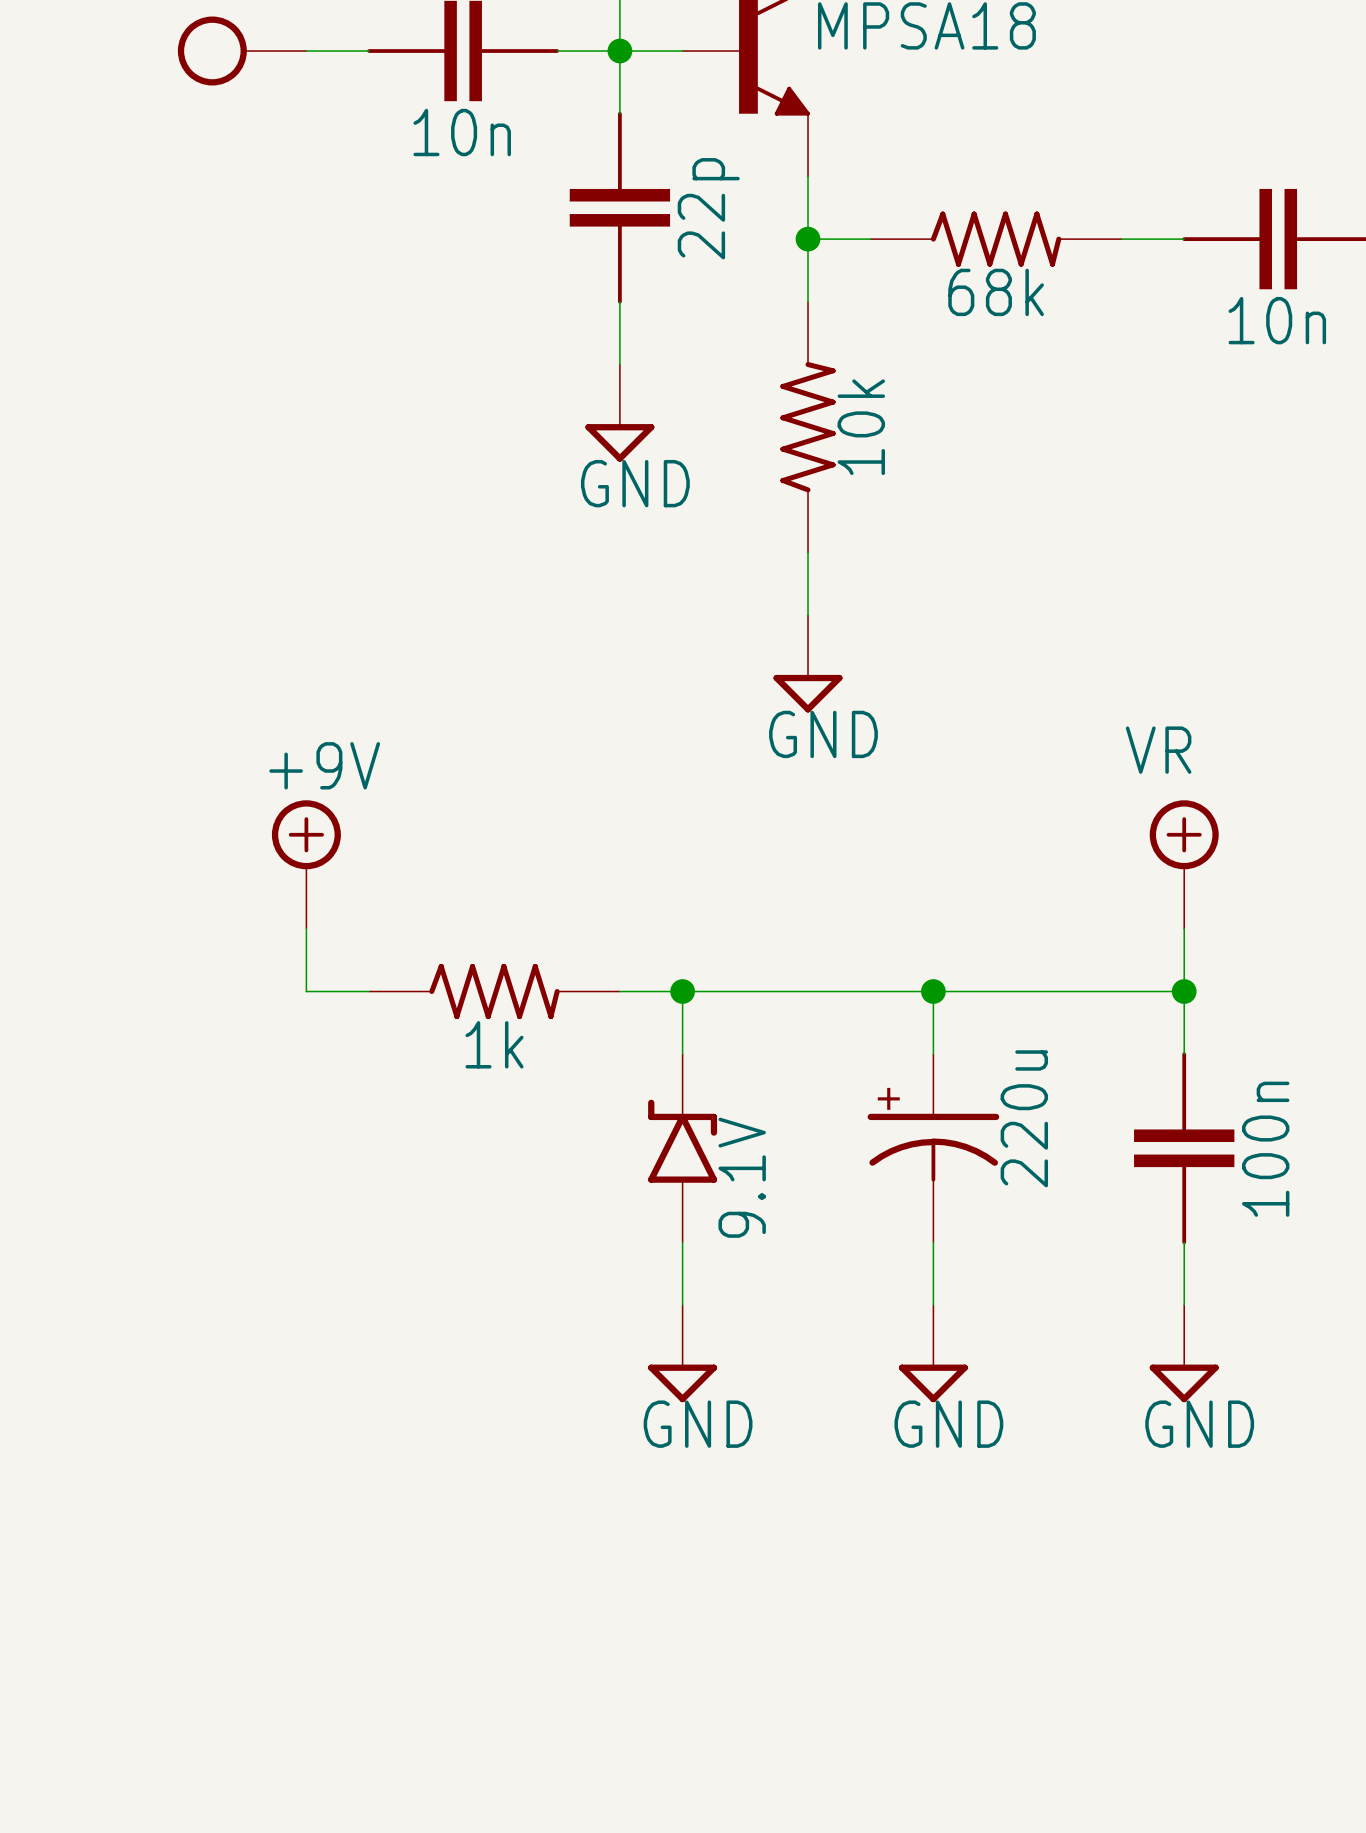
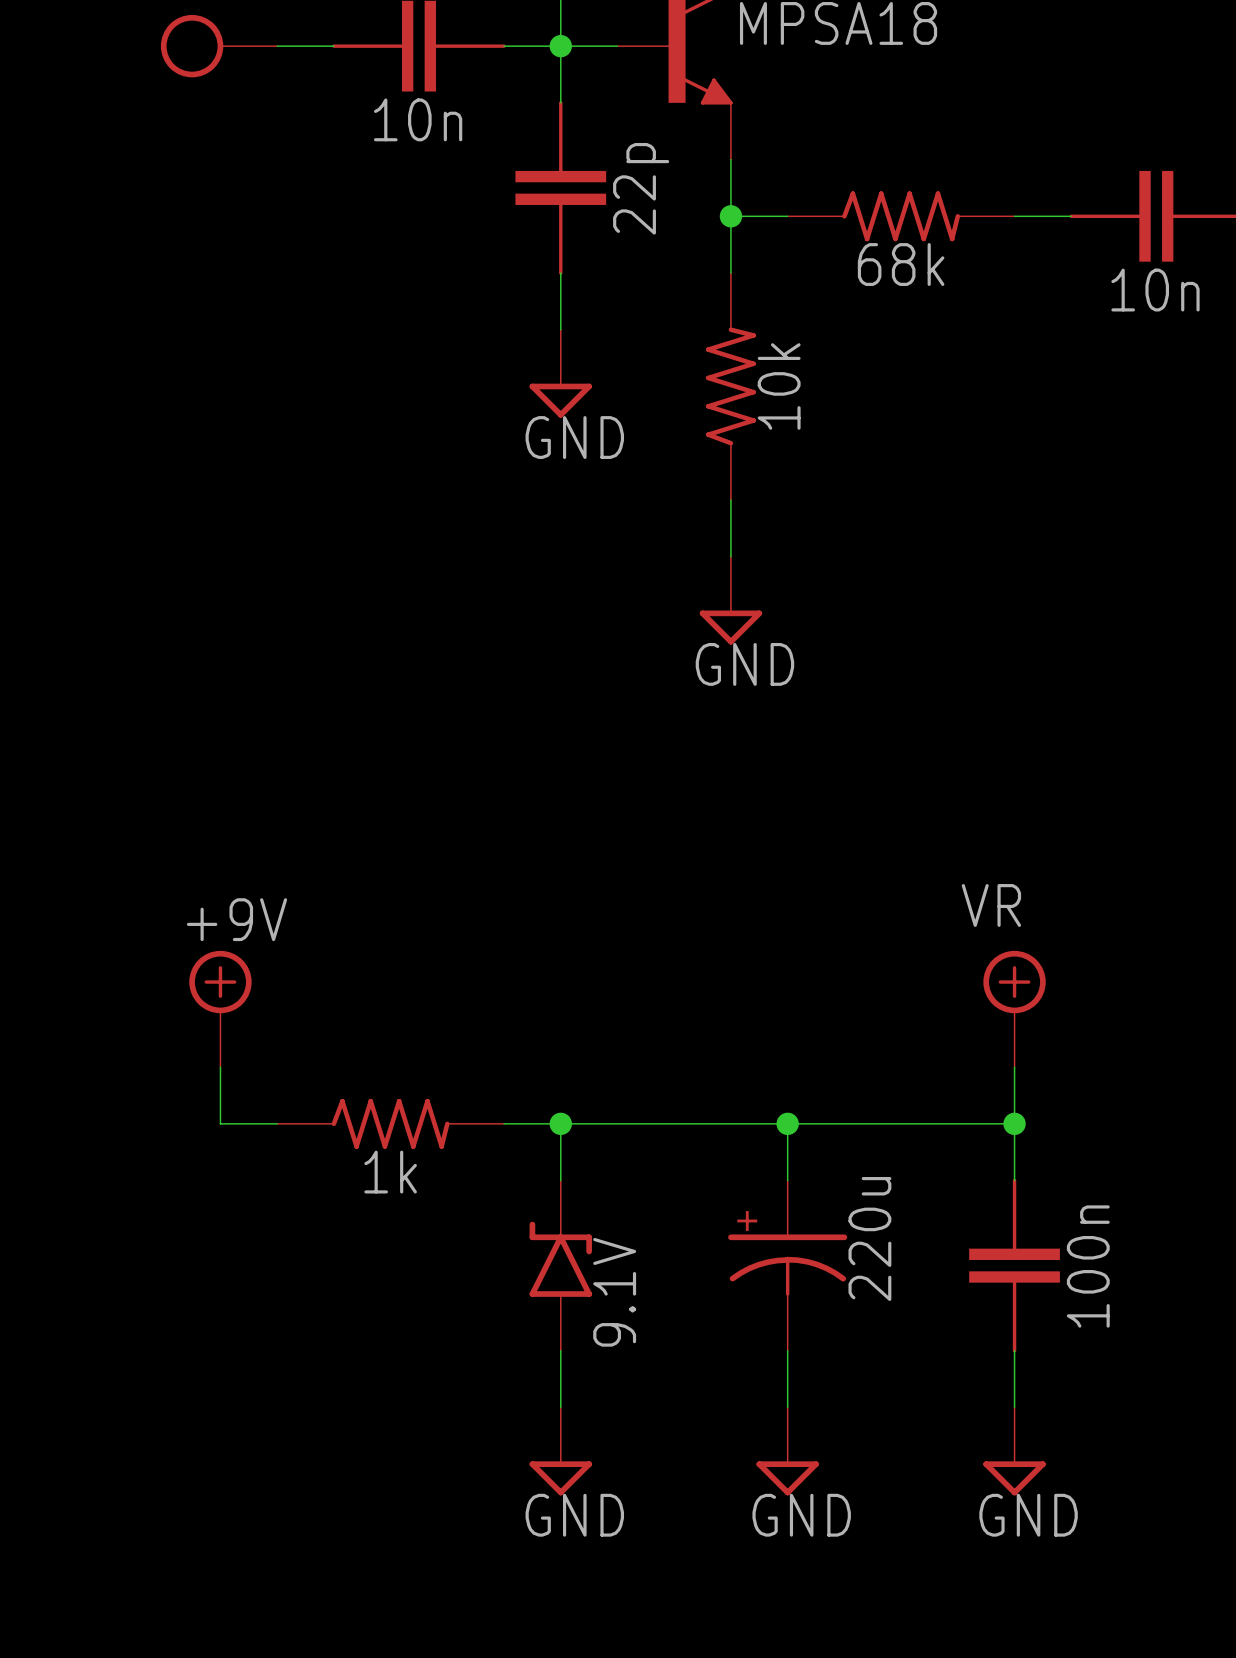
power symbol position: +9V (306, 864) -> +9V (220, 1008)
power symbol position: VR (1184, 864) -> VR (1014, 1008)
wire: (306, 928) (306, 991) (369, 991) -> (220, 1067) (220, 1123) (277, 1123)
wire: (1184, 928) (1184, 1054) -> (1014, 1067) (1014, 1180)
part position: (494, 991) -> (390, 1123)
wire: (619, 991) (1184, 991) -> (504, 1123) (1014, 1123)
wire: (682, 991) (682, 1054) -> (560, 1123) (560, 1180)
junction: (682, 991) -> none
wire: (933, 991) (933, 1054) -> (787, 1123) (787, 1180)
junction: (933, 991) -> none
junction: (1184, 991) -> none
part position: (682, 1148) -> (560, 1265)
part position: (933, 1148) -> (787, 1265)
part position: (1184, 1148) -> (1014, 1265)
junction: none -> (560, 1123)
wire: (682, 1242) (682, 1305) -> (560, 1350) (560, 1407)
junction: none -> (787, 1123)
wire: (933, 1242) (933, 1305) -> (787, 1350) (787, 1407)
junction: none -> (1014, 1123)
wire: (1184, 1242) (1184, 1305) -> (1014, 1350) (1014, 1407)
power symbol: GND (682, 1353) -> none
power symbol: GND (933, 1353) -> none
power symbol: GND (1184, 1353) -> none
power symbol: none -> GND (560, 1451)
power symbol: none -> GND (787, 1451)
power symbol: none -> GND (1014, 1451)

